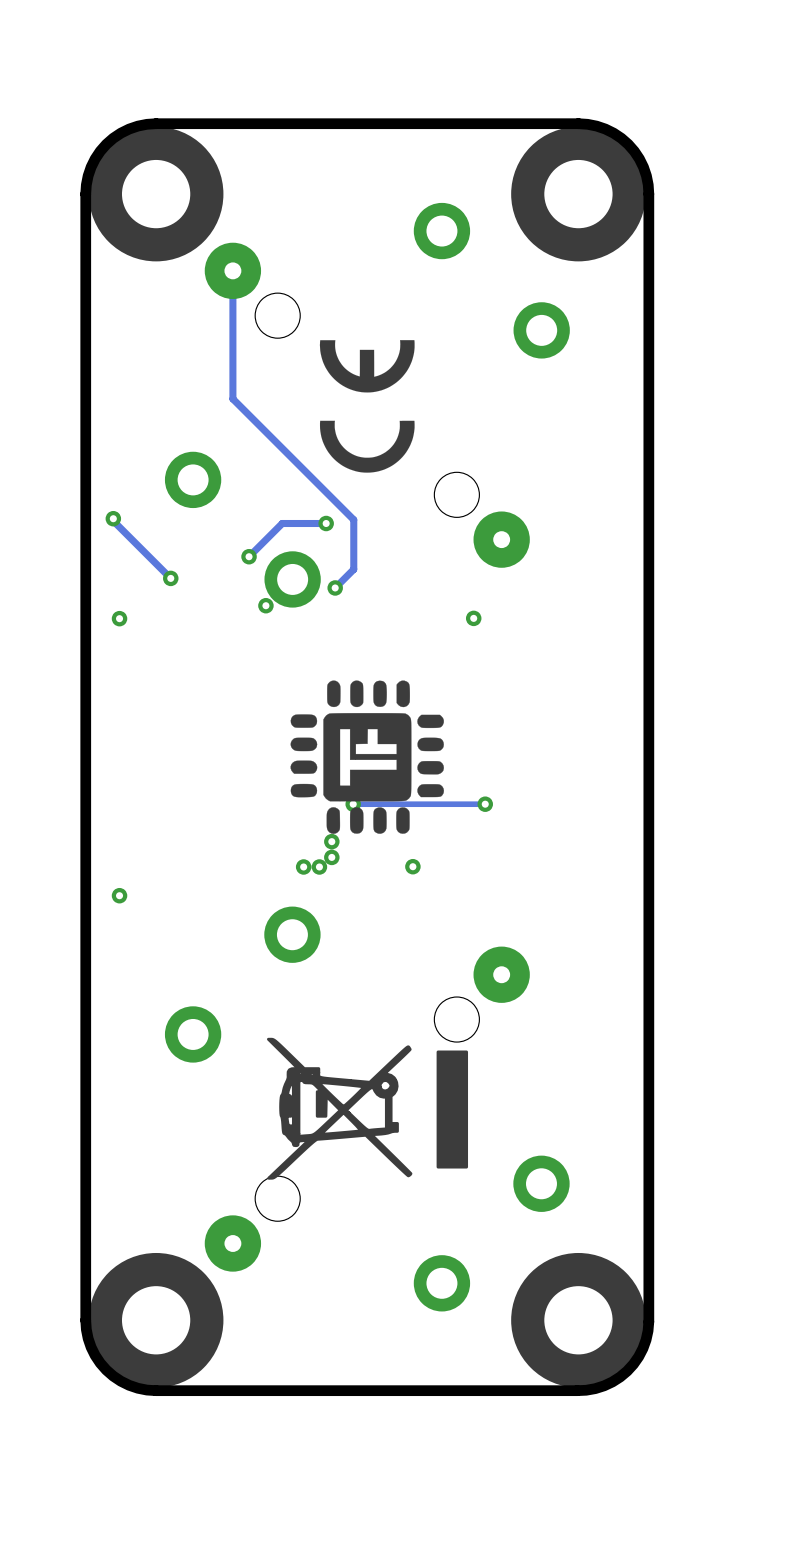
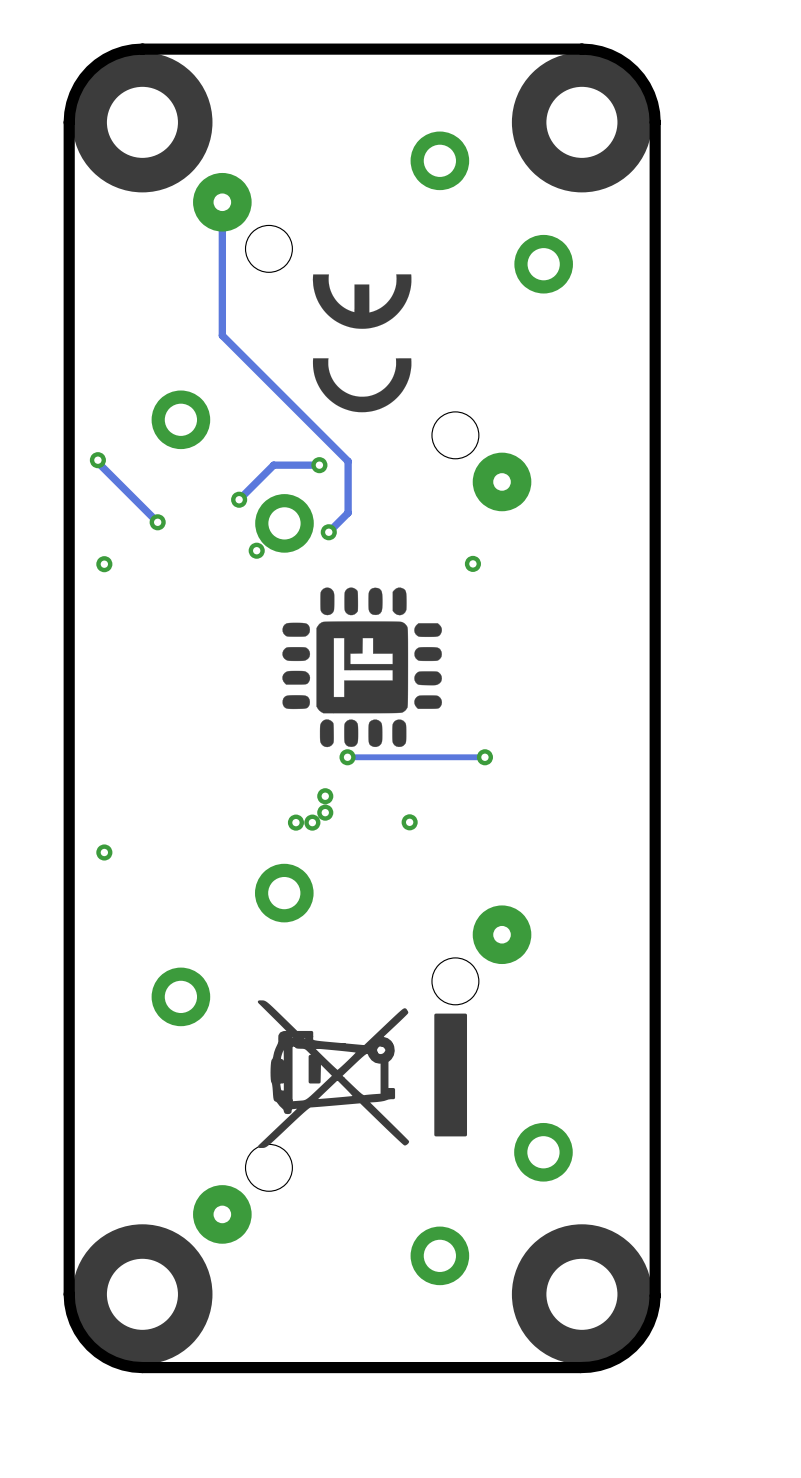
drawing position: (367, 757) -> (362, 667)

